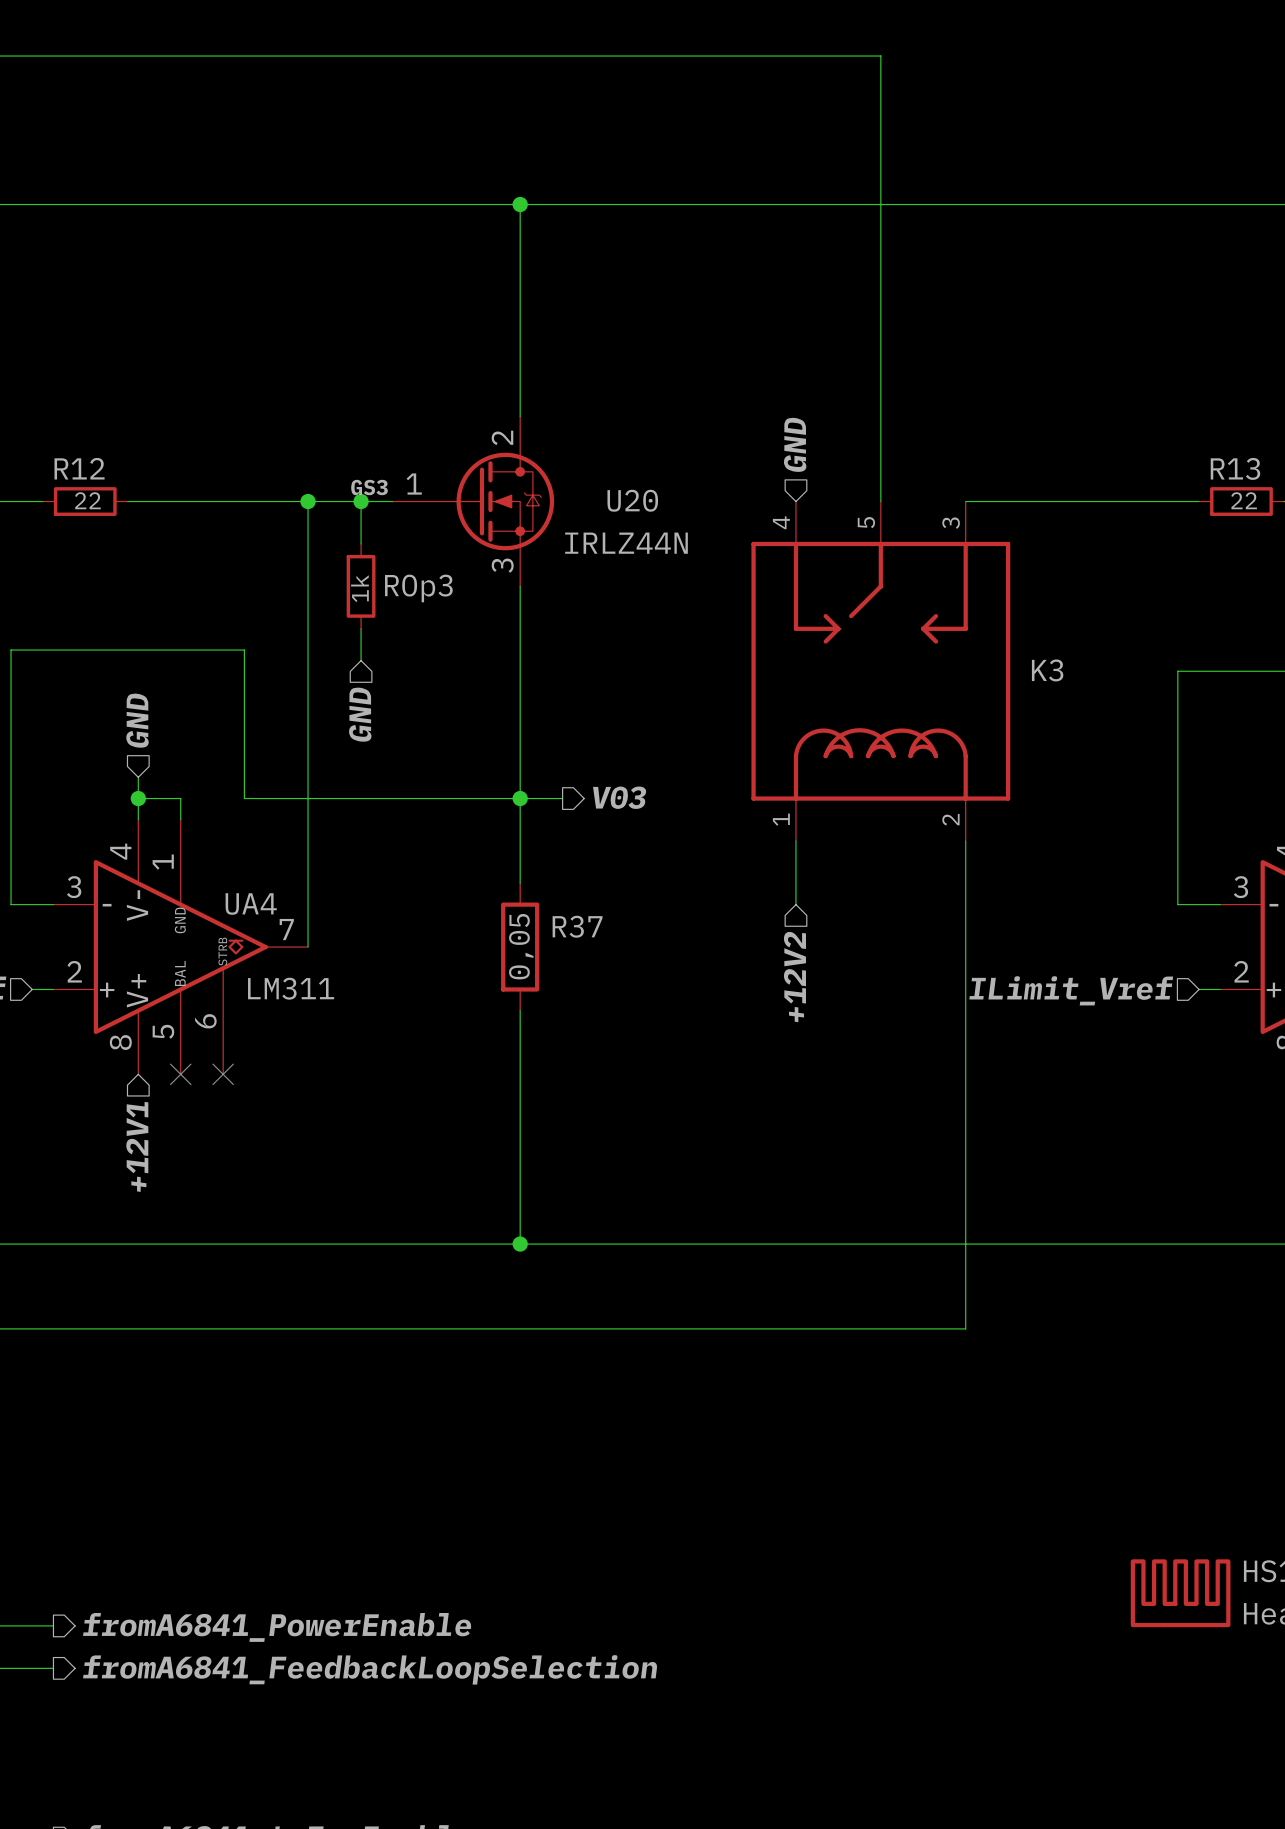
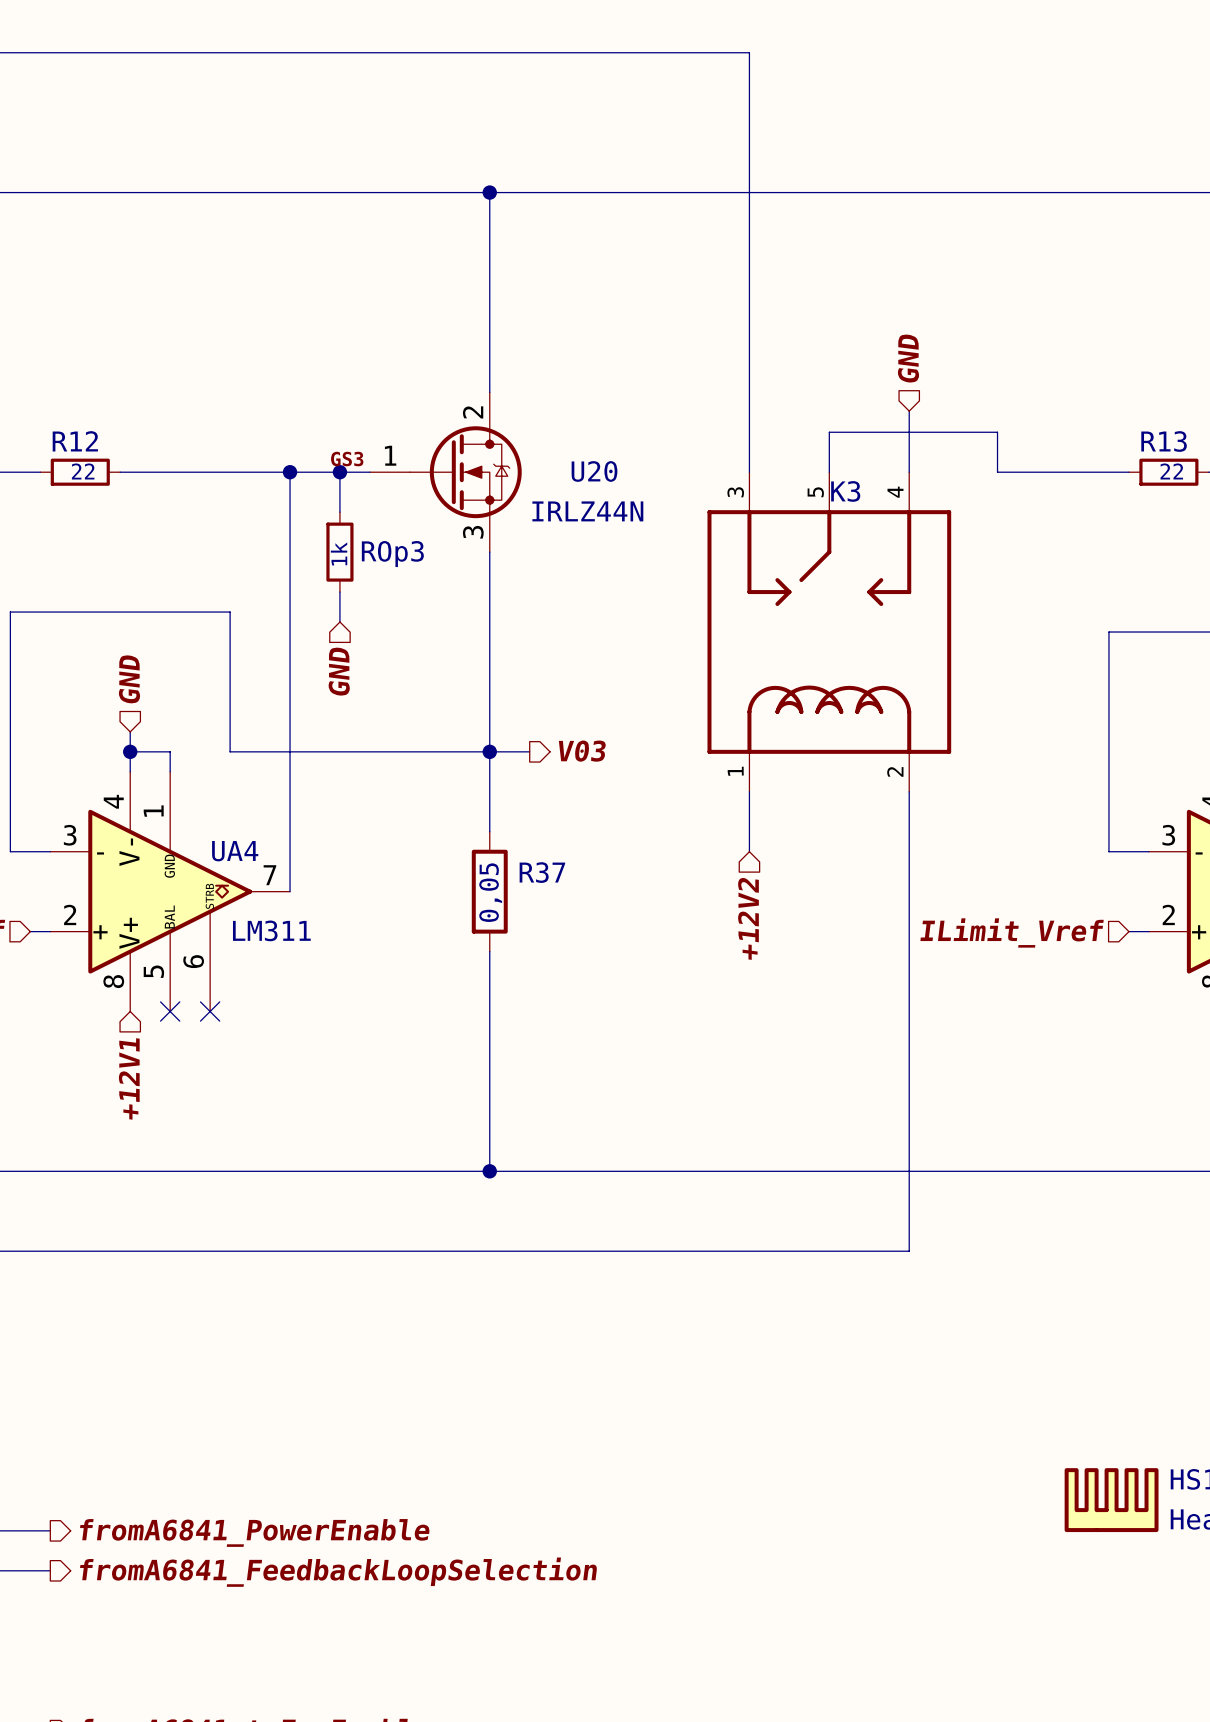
wire: (795, 56) (880, 56) (880, 459) -> (749, 52) (749, 472)
wire: none -> (909, 411) (909, 472)
hierarchical label position: GND (795, 444) -> GND (908, 358)
wire: (965, 501) (1059, 501) -> (829, 432) (997, 432) (997, 472)
K3 pin number: 4 (781, 522) -> 3 (735, 492)
K3 pin number: 3 (951, 523) -> 4 (895, 492)
K3 name position: K3 (1047, 670) -> K3 (845, 491)

